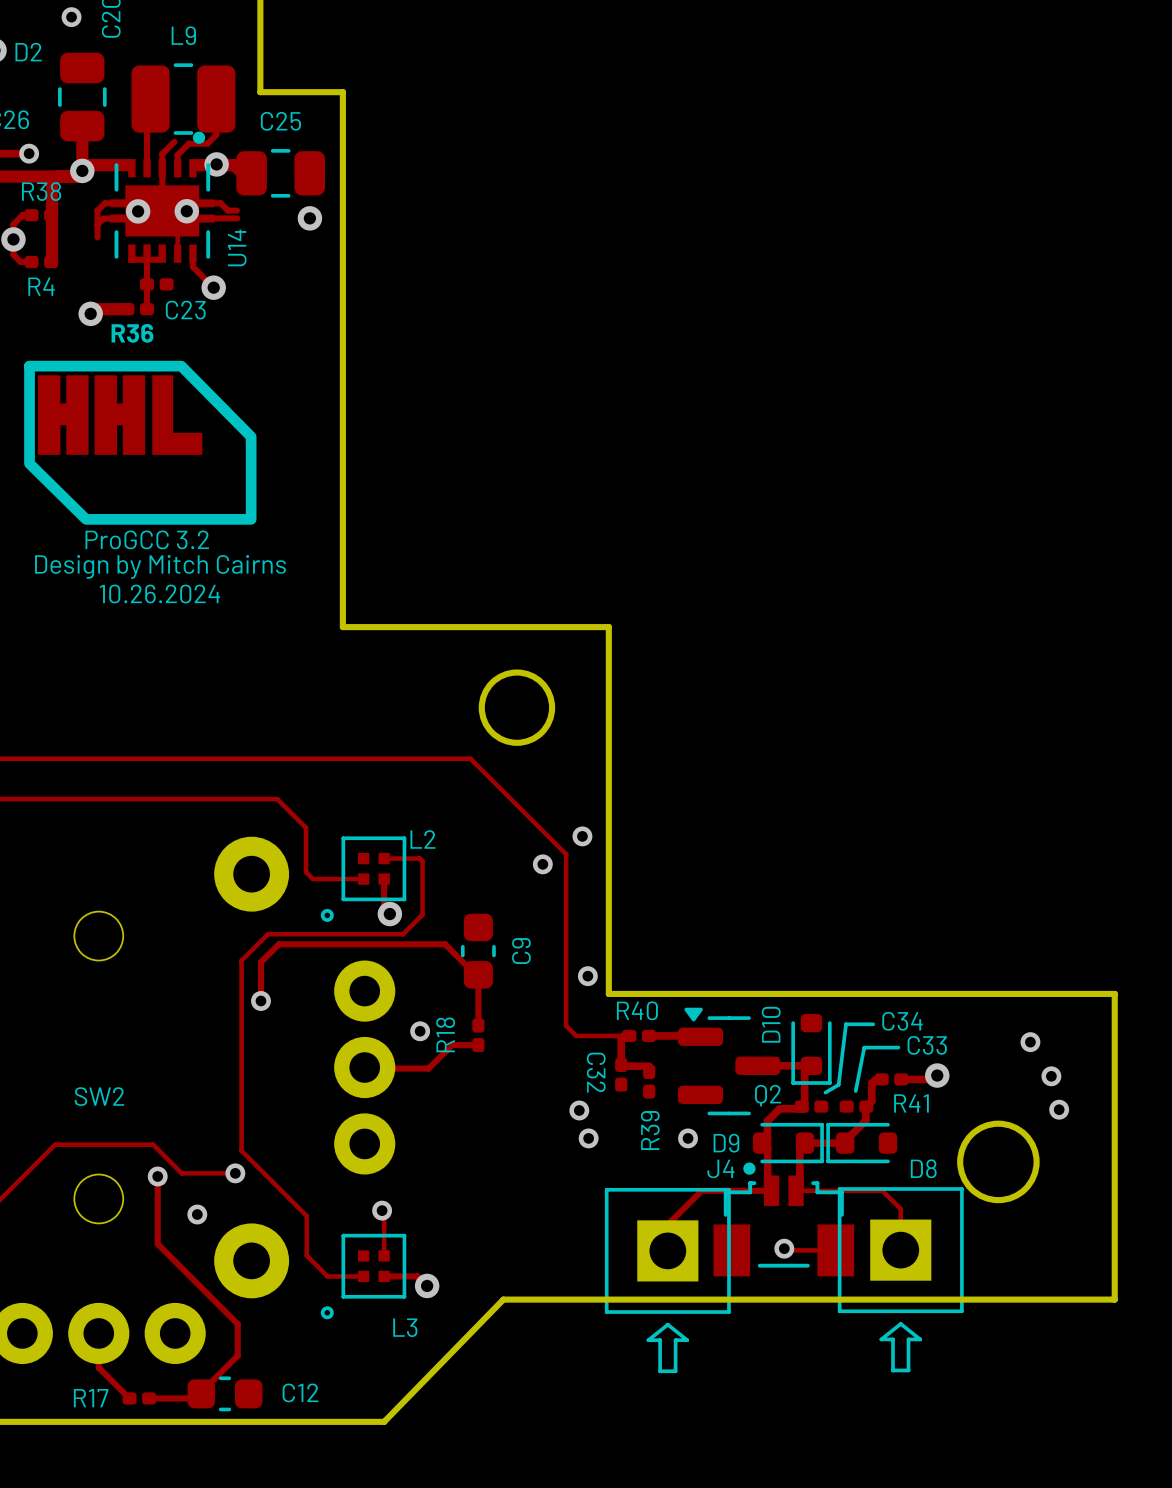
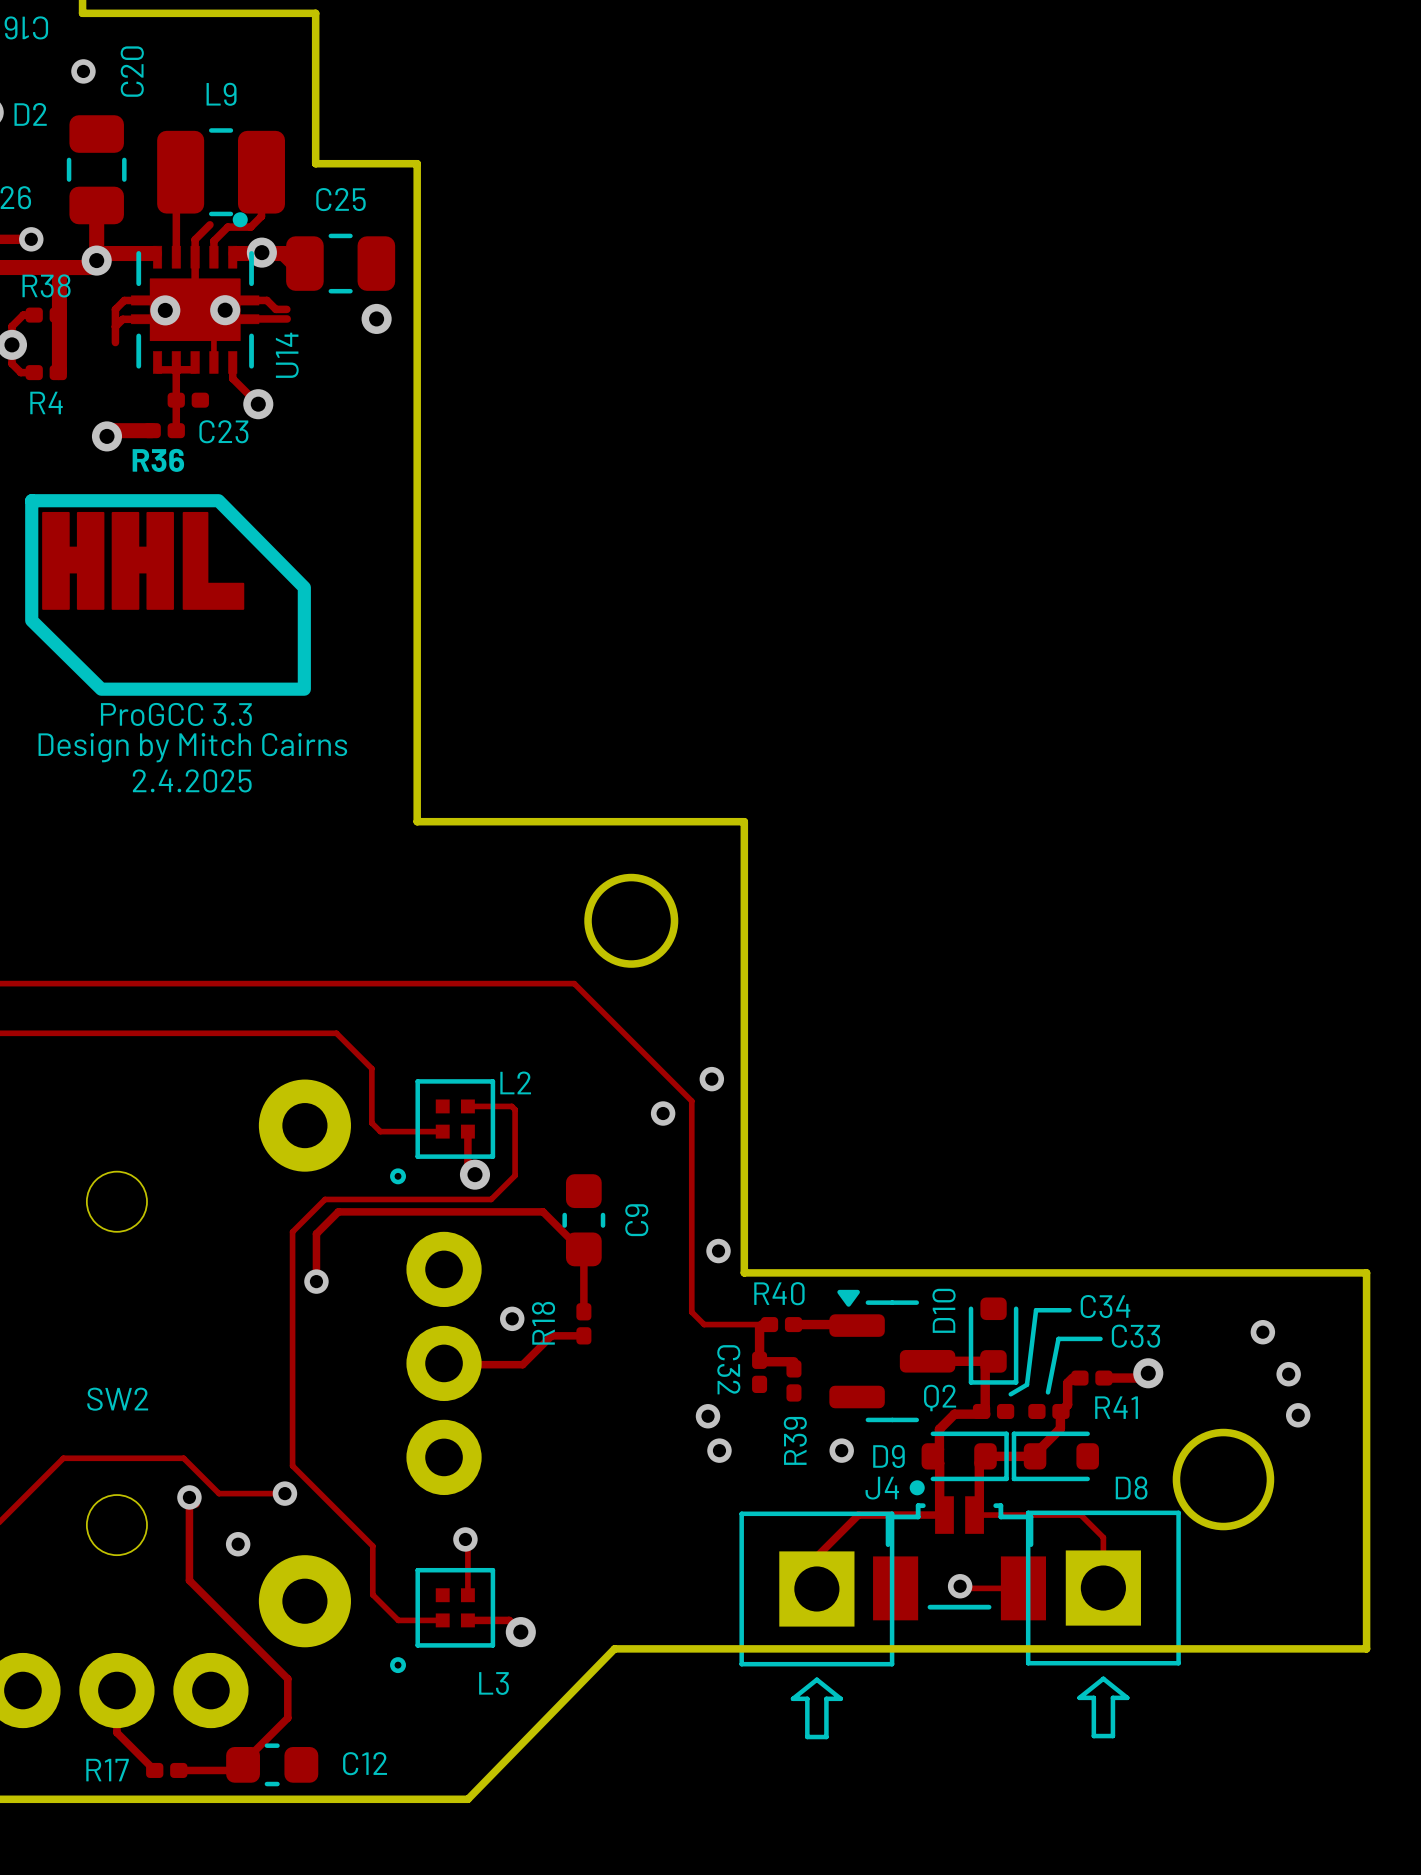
text: ProGCC 3.2 (147, 539) -> ProGCC 3.3 (176, 714)
text: 10.26.2024 (159, 593) -> 2.4.2025 (192, 780)

